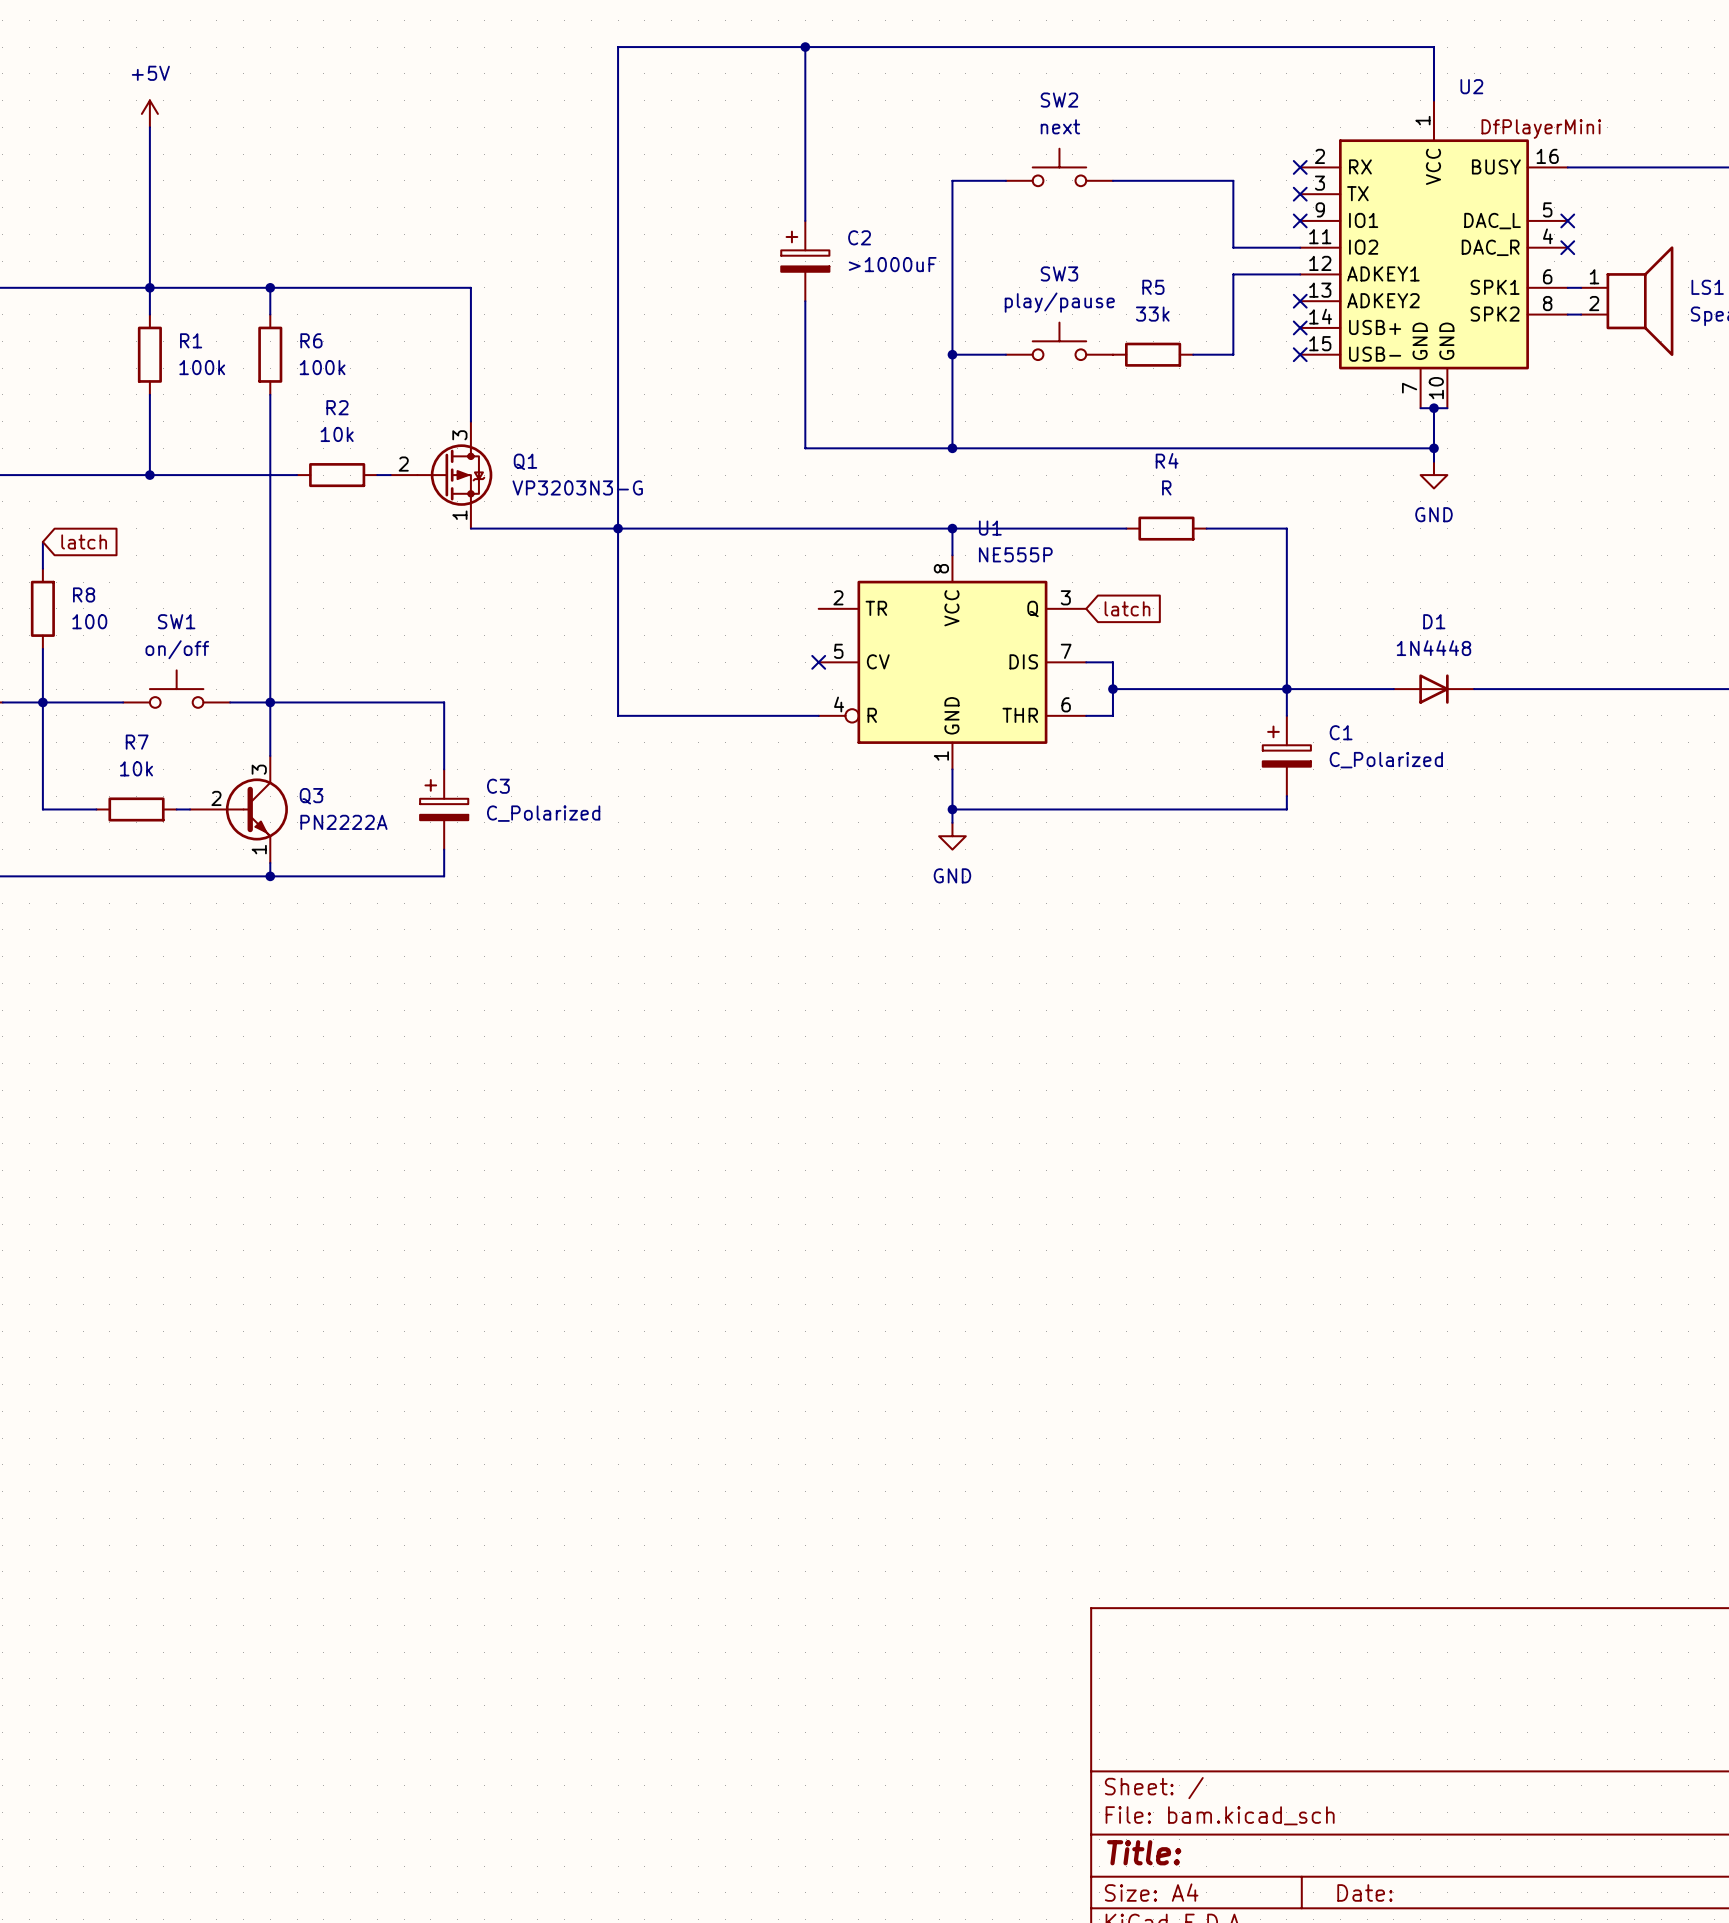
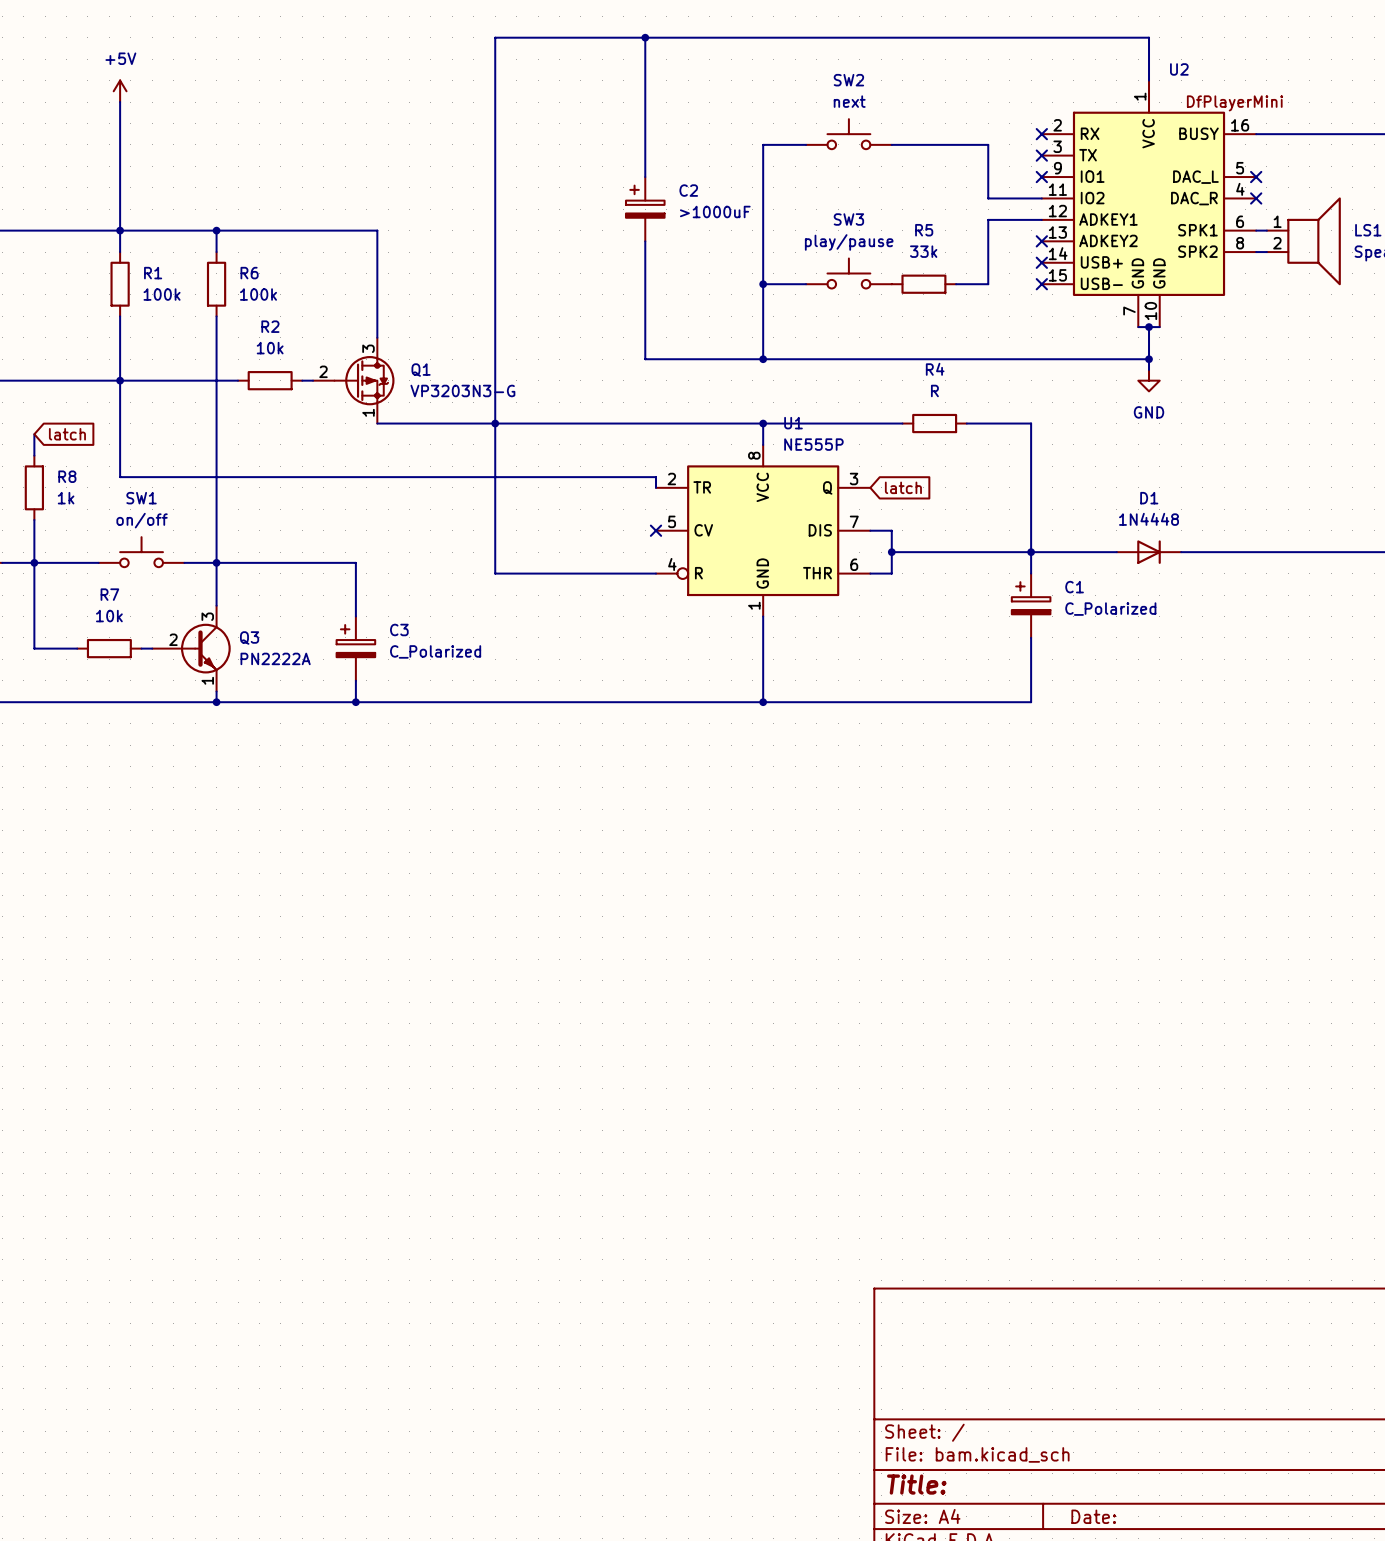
wire: none -> (120, 380) (120, 477) (655, 477) (655, 487)
R8 value: 100 (89, 621) -> 1k (66, 498)
wire: (952, 809) (1286, 809) -> (355, 702) (1031, 702) (1031, 648)
junction: (952, 809) -> none
wire: none -> (763, 659) (763, 702)
power symbol: GND (952, 836) -> none
junction: none -> (355, 702)
junction: none -> (763, 702)

